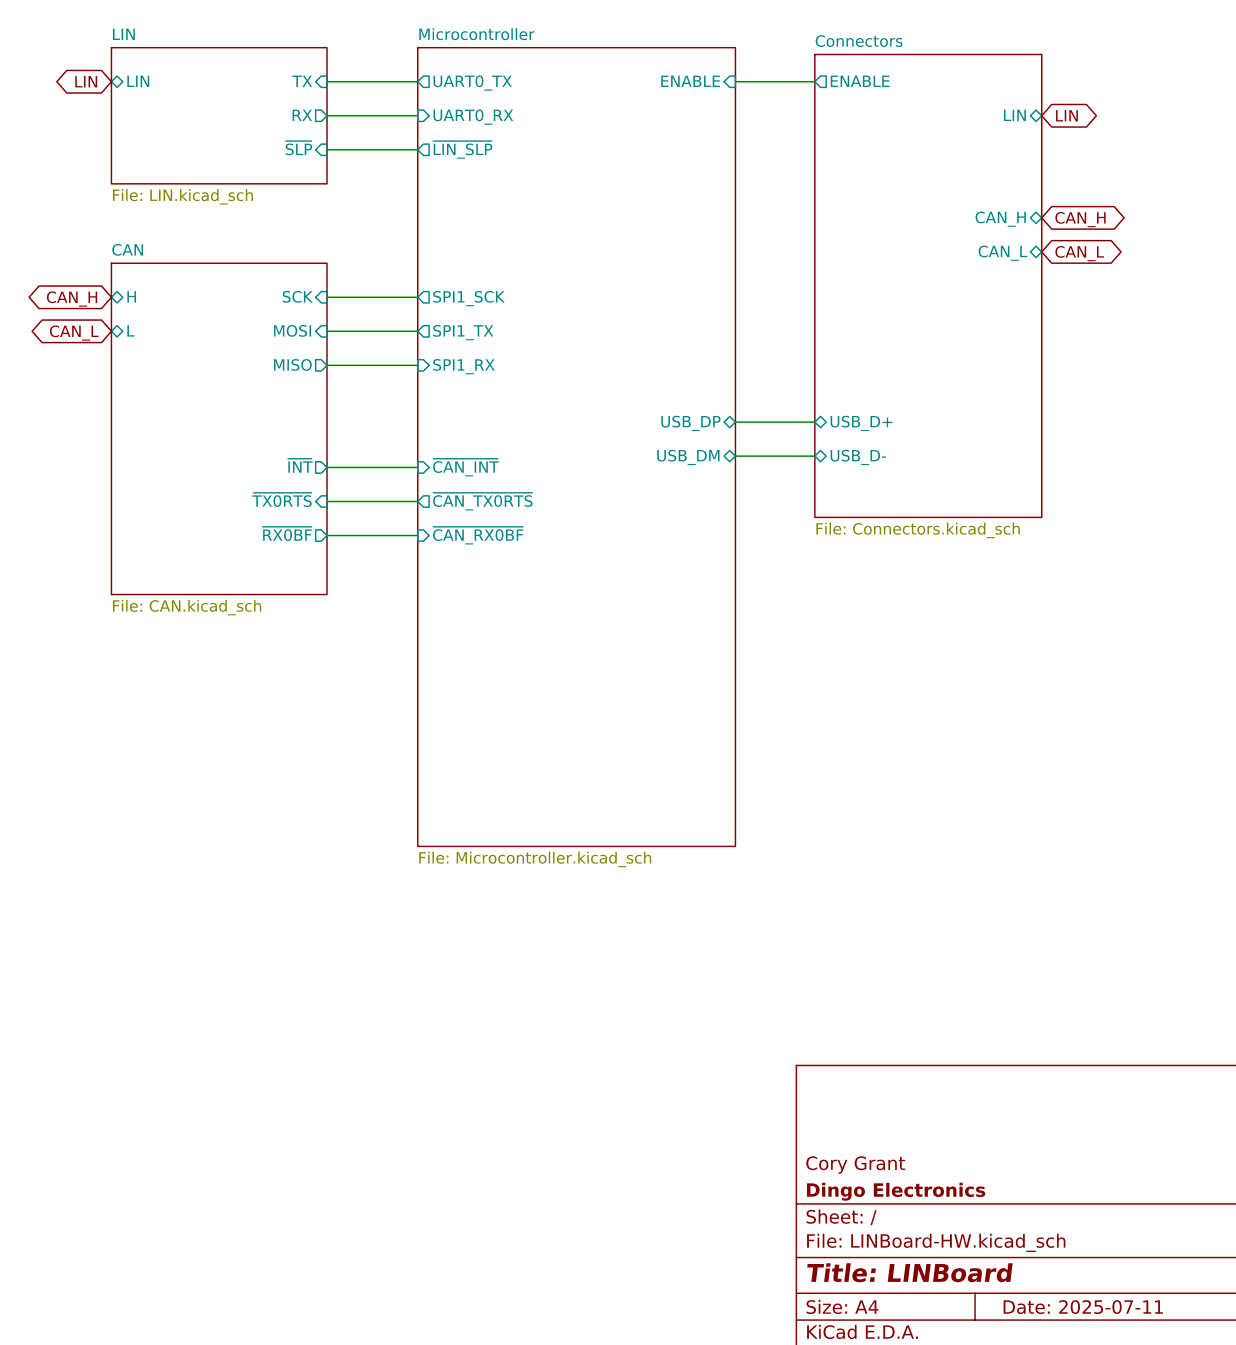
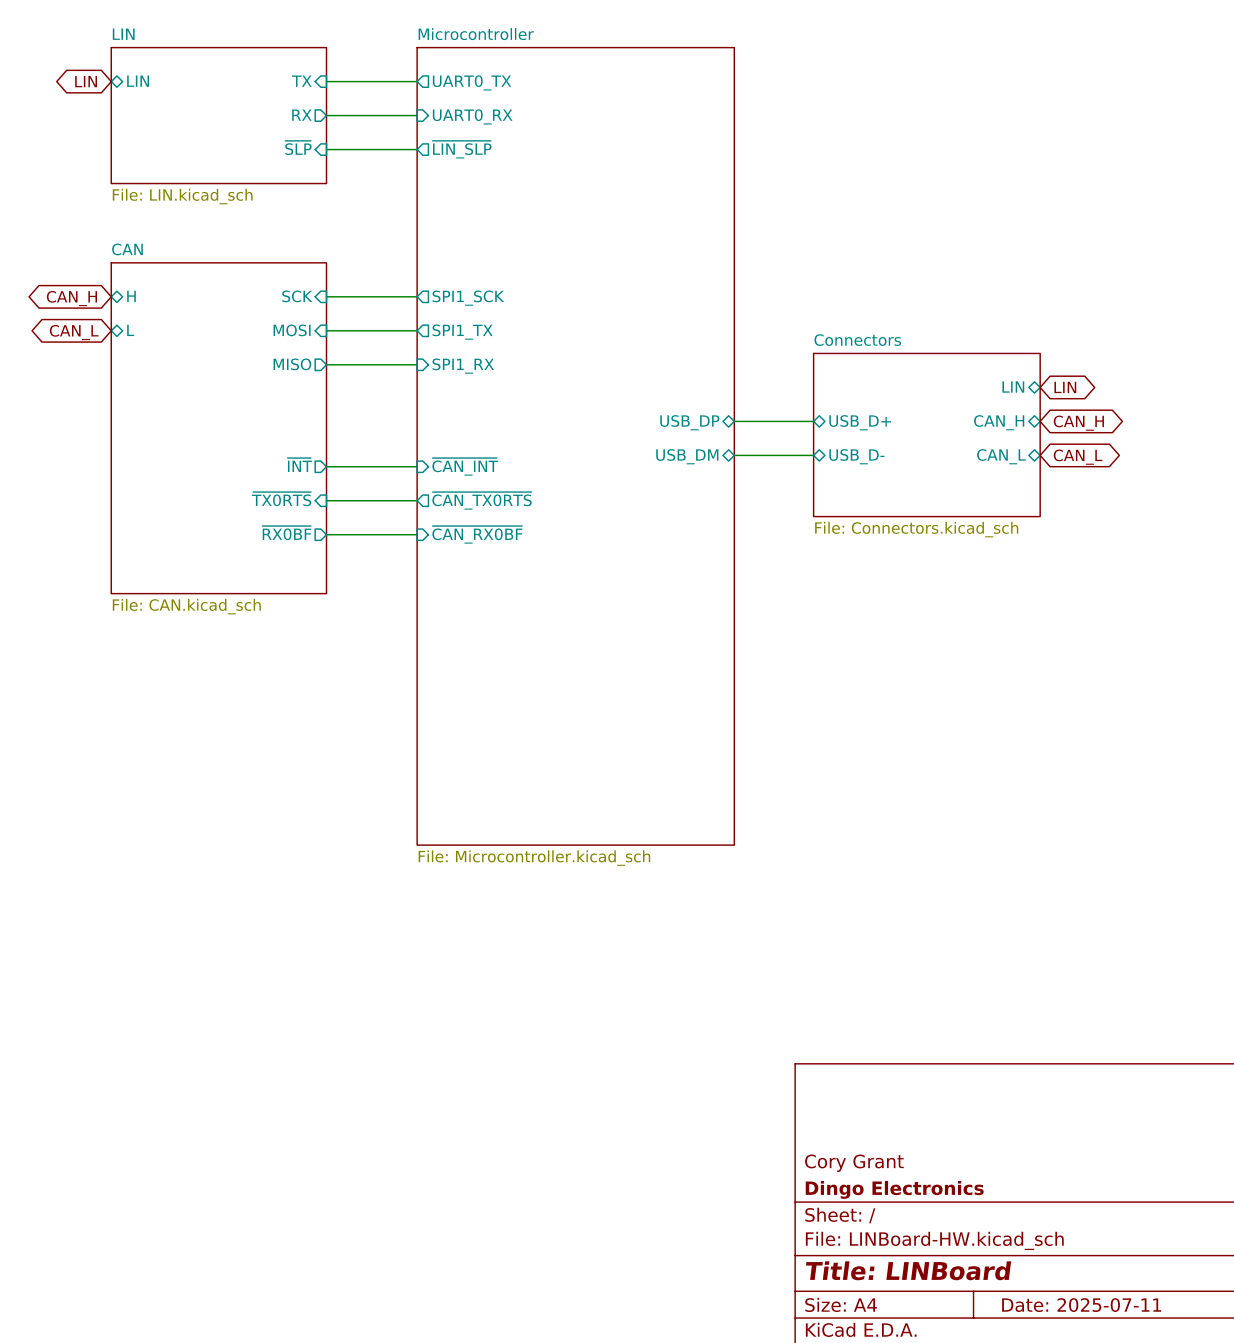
sheet pin: ENABLE (690, 81) -> none
wire: (735, 81) (814, 81) -> none
sheet pin: ENABLE (860, 81) -> none
sheet pin: LIN (1014, 115) -> none
global label: LIN (1066, 115) -> none
sheet pin position: CAN_H (1000, 219) -> CAN_H (999, 422)
global label position: CAN_H (1080, 219) -> CAN_H (1078, 423)
sheet pin position: CAN_L (1002, 253) -> CAN_L (1001, 456)
global label position: CAN_L (1079, 253) -> CAN_L (1078, 457)
sheet Connectors: File: Connectors.kicad_sch (928, 285) -> none
sheet pin: none -> LIN (1013, 387)
global label: none -> LIN (1065, 387)
sheet Connectors: none -> File: Connectors.kicad_sch (926, 435)

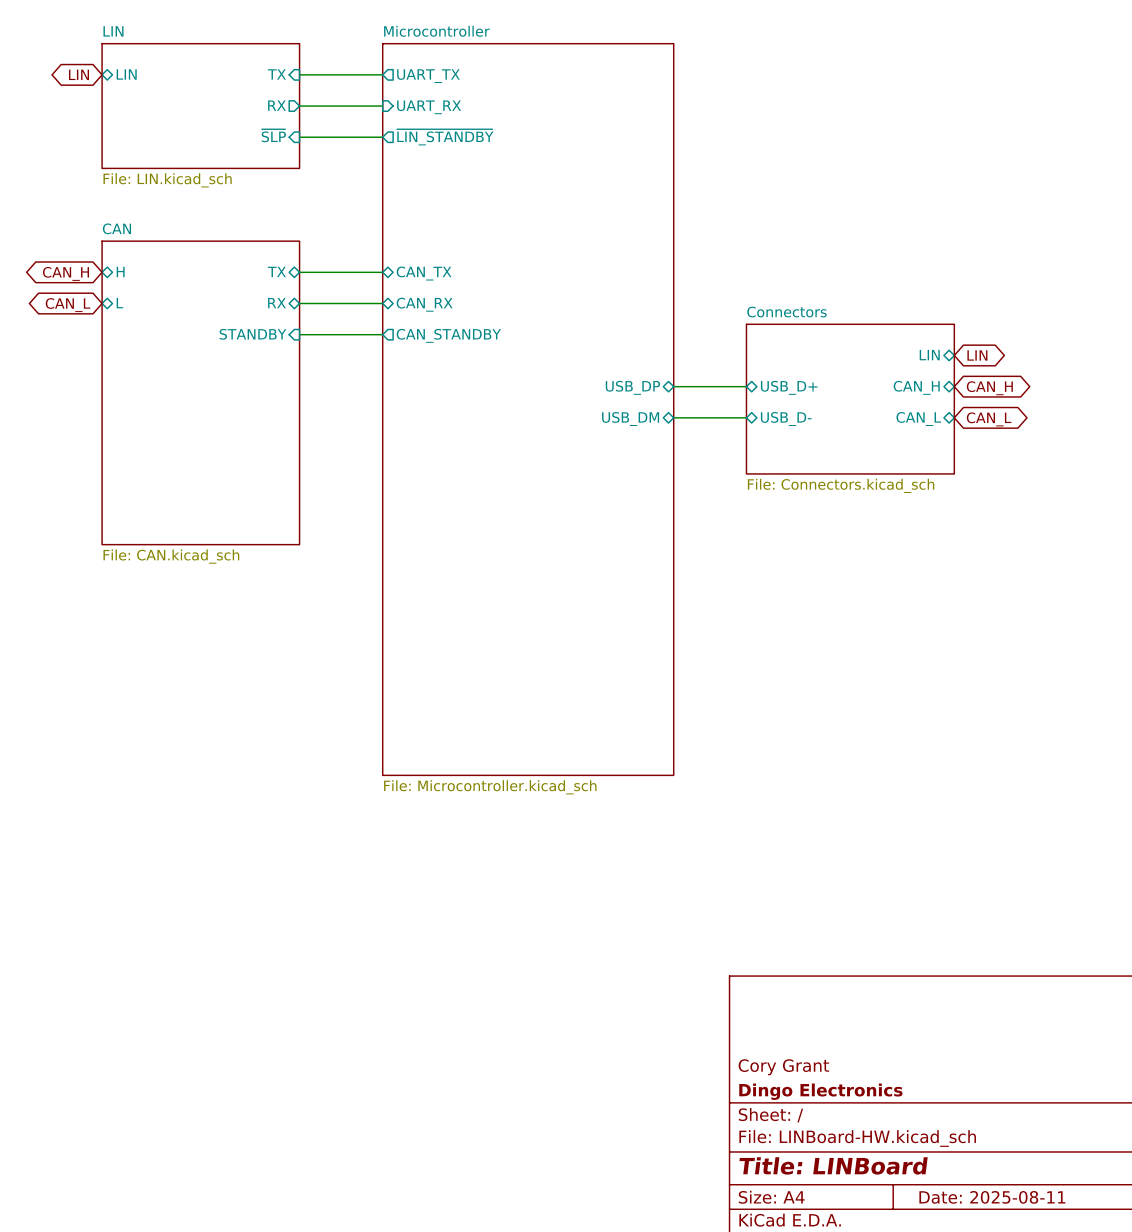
sheet pin: UART0_TX (471, 82) -> UART_TX (428, 76)
sheet pin: UART0_RX (472, 116) -> UART_RX (429, 107)
sheet pin: ~{LIN_SLP} (462, 149) -> ~{LIN_STANDBY} (445, 137)
sheet pin shape: input (297, 296) -> bidirectional (276, 271)
sheet pin: SCK (297, 296) -> TX (276, 271)
sheet pin shape: output (468, 298) -> bidirectional (424, 273)
sheet pin: SPI1_SCK (468, 298) -> CAN_TX (424, 273)
sheet pin shape: input (292, 330) -> bidirectional (277, 303)
sheet pin: MOSI (292, 330) -> RX (277, 303)
sheet pin shape: output (462, 332) -> bidirectional (424, 304)
sheet pin: SPI1_TX (462, 332) -> CAN_RX (424, 304)
sheet pin shape: output (292, 364) -> input (253, 334)
sheet pin: MISO (292, 364) -> STANDBY (253, 334)
sheet pin shape: input (463, 366) -> output (448, 335)
sheet pin: SPI1_RX (463, 366) -> CAN_STANDBY (448, 335)
sheet pin: ~{INT} (299, 465) -> none
wire: (326, 466) (417, 466) -> none
sheet pin: ~{CAN_INT} (465, 466) -> none
sheet pin: ~{TX0RTS} (281, 499) -> none
wire: (326, 500) (417, 500) -> none
sheet pin: ~{CAN_TX0RTS} (482, 500) -> none
sheet pin: ~{RX0BF} (286, 533) -> none
wire: (326, 534) (417, 534) -> none
sheet pin: ~{CAN_RX0BF} (477, 534) -> none
title block: Date: 2025-07-11 (1081, 1305) -> Date: 2025-08-11 (992, 1197)

